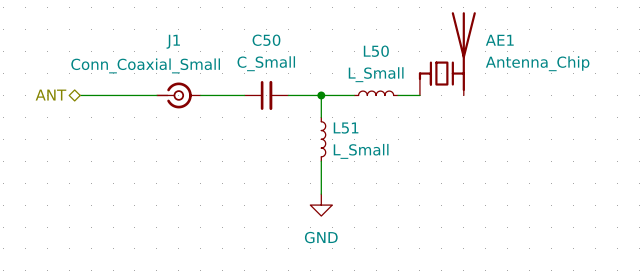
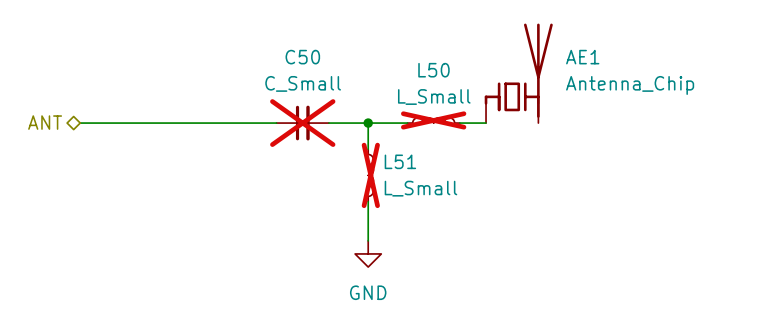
L50 do-not-place cross: none -> (433, 120)
J1: Conn_Coaxial_Small (178, 95) -> none
C50 do-not-place cross: none -> (302, 123)
L51 do-not-place cross: none -> (370, 175)

